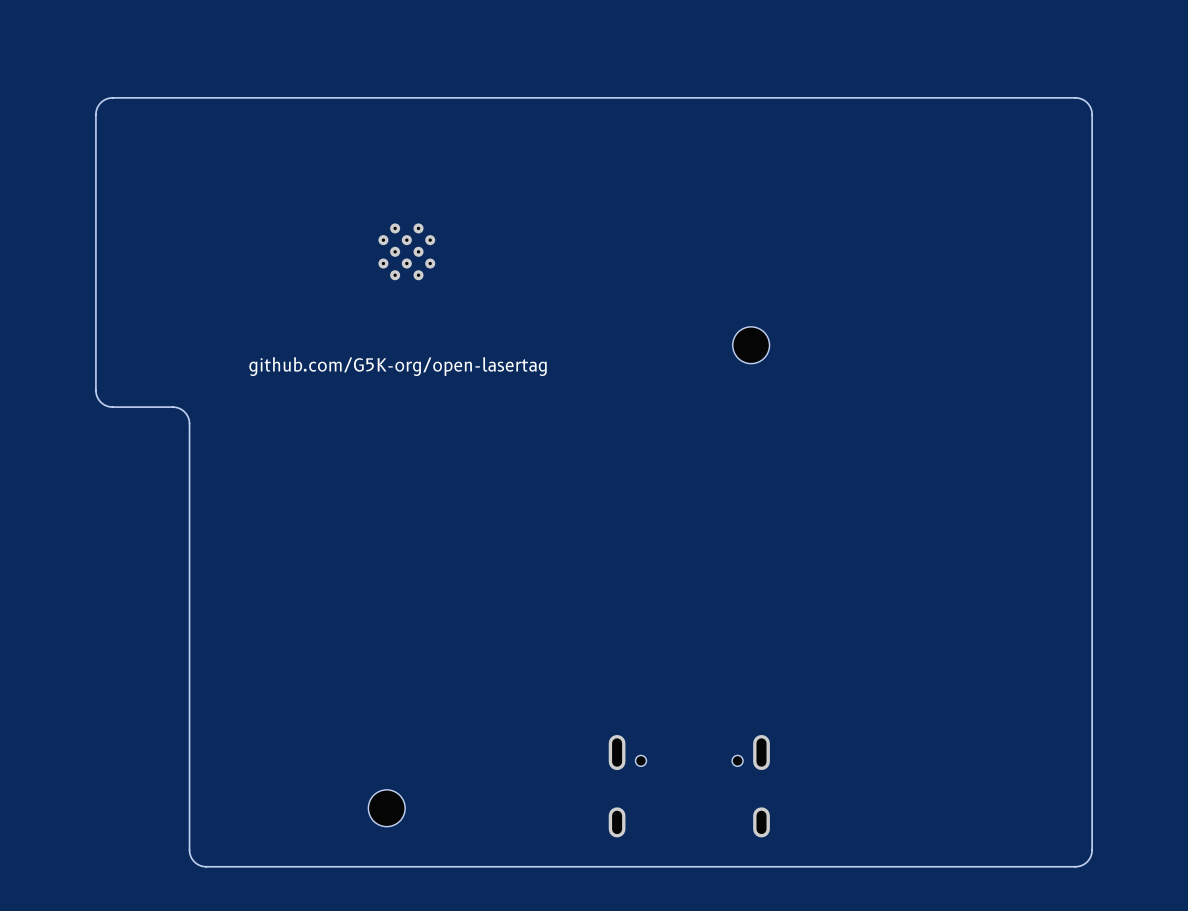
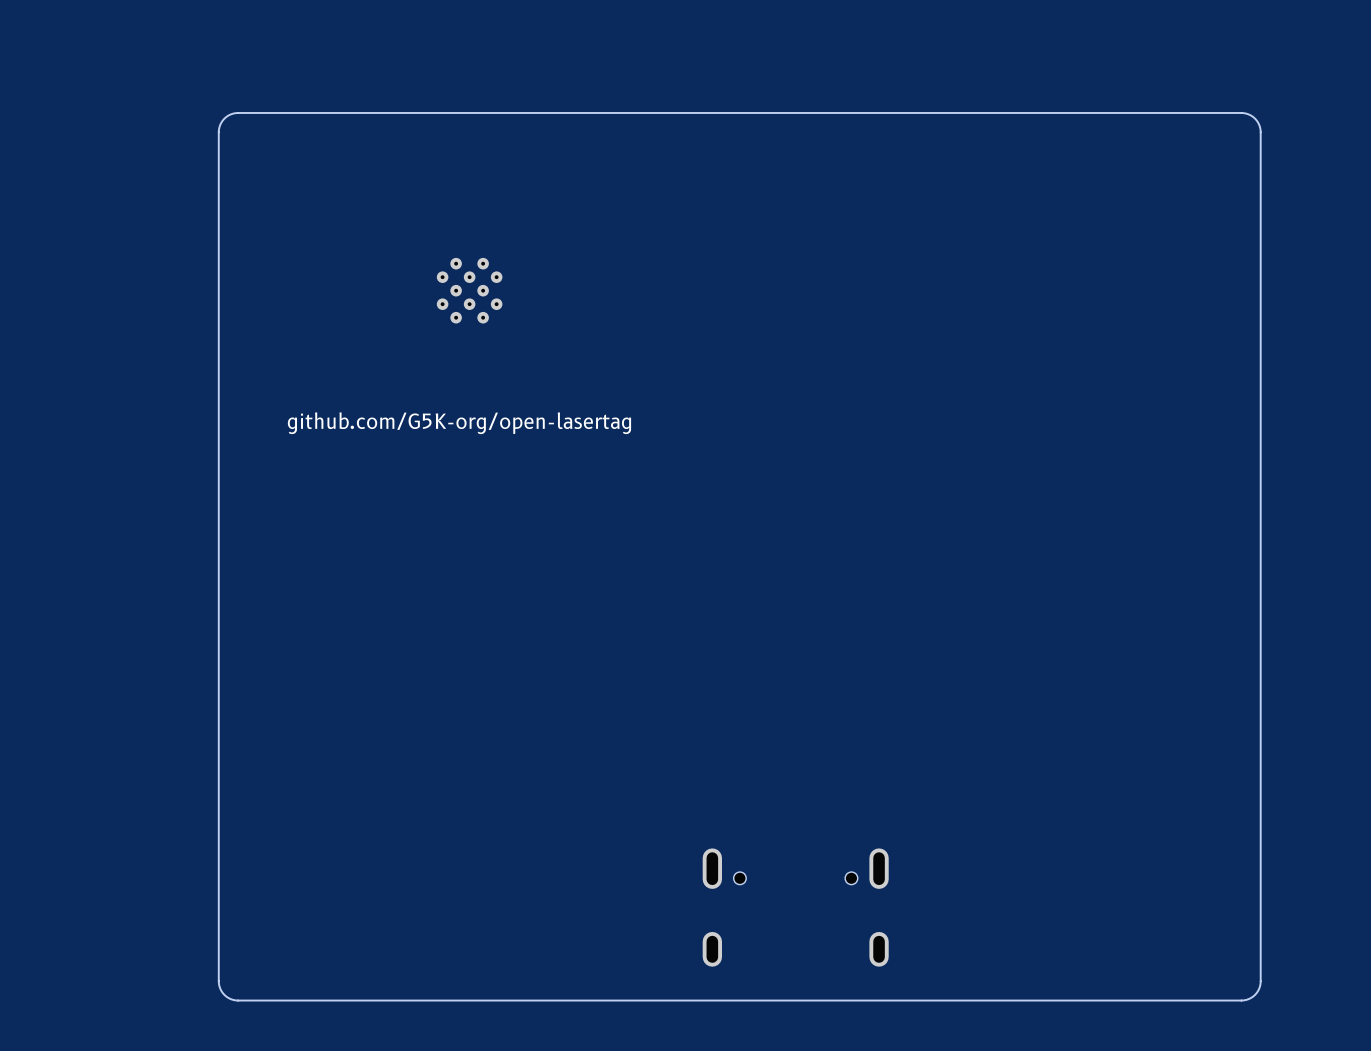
board edge: (206, 97) (110, 97) (99, 104) (95, 114) (96, 395) (102, 403) (110, 407) (178, 408) (186, 414) (189, 423) -> (238, 112) (224, 118) (218, 132) (218, 489)
part: (751, 345) -> none
part: (386, 808) -> none

